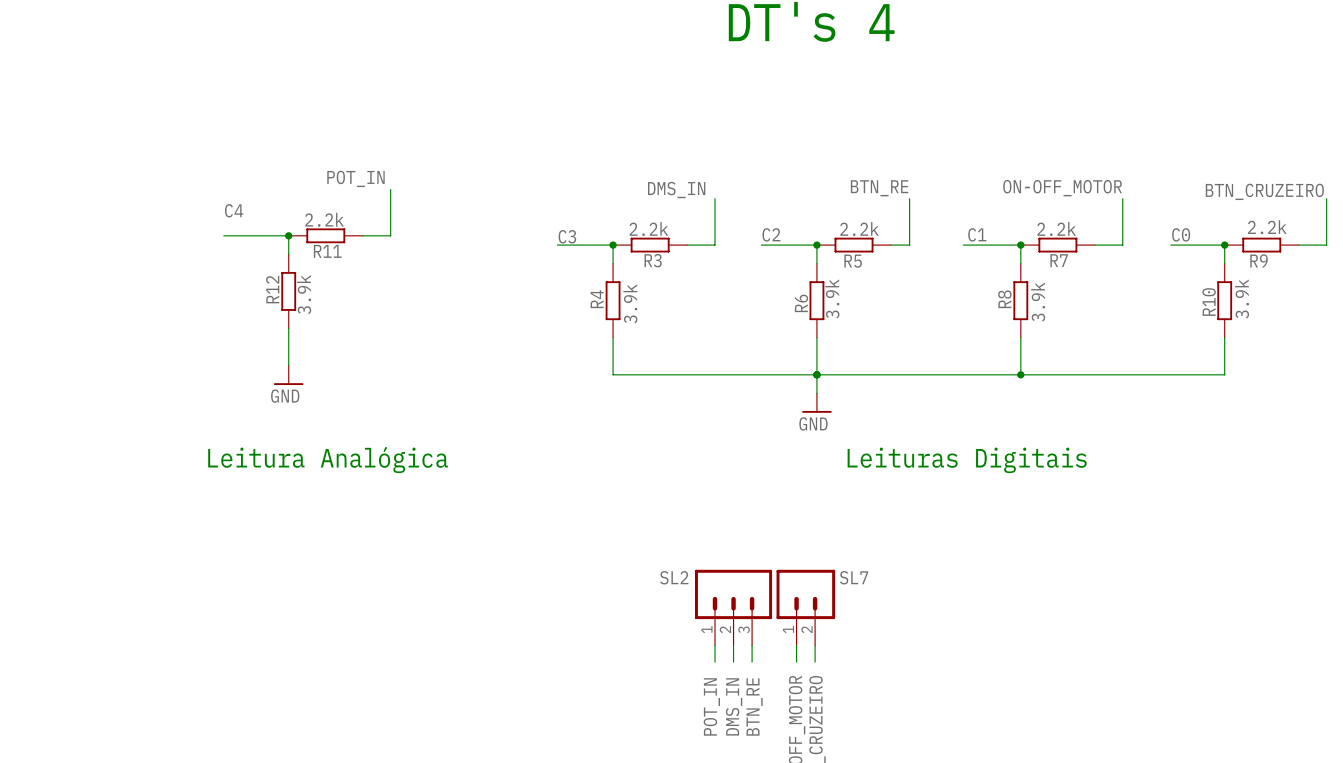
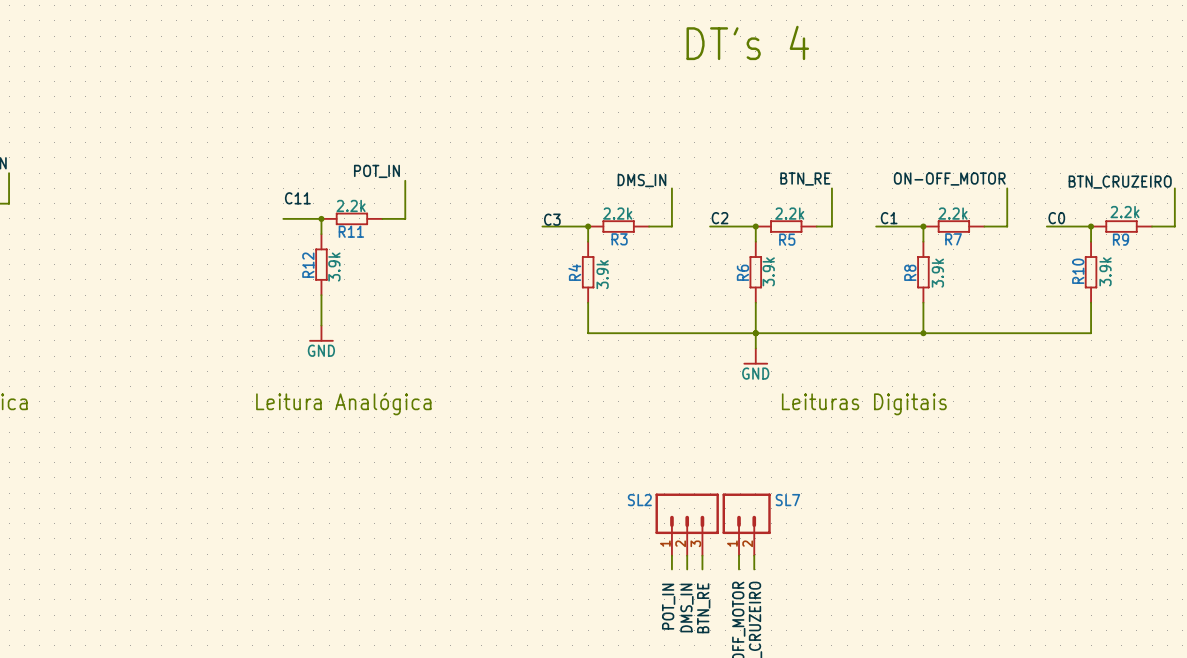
label: C4 (234, 210) -> none
label: none -> C11 (297, 198)
wire: (223, 235) (242, 235) -> none

